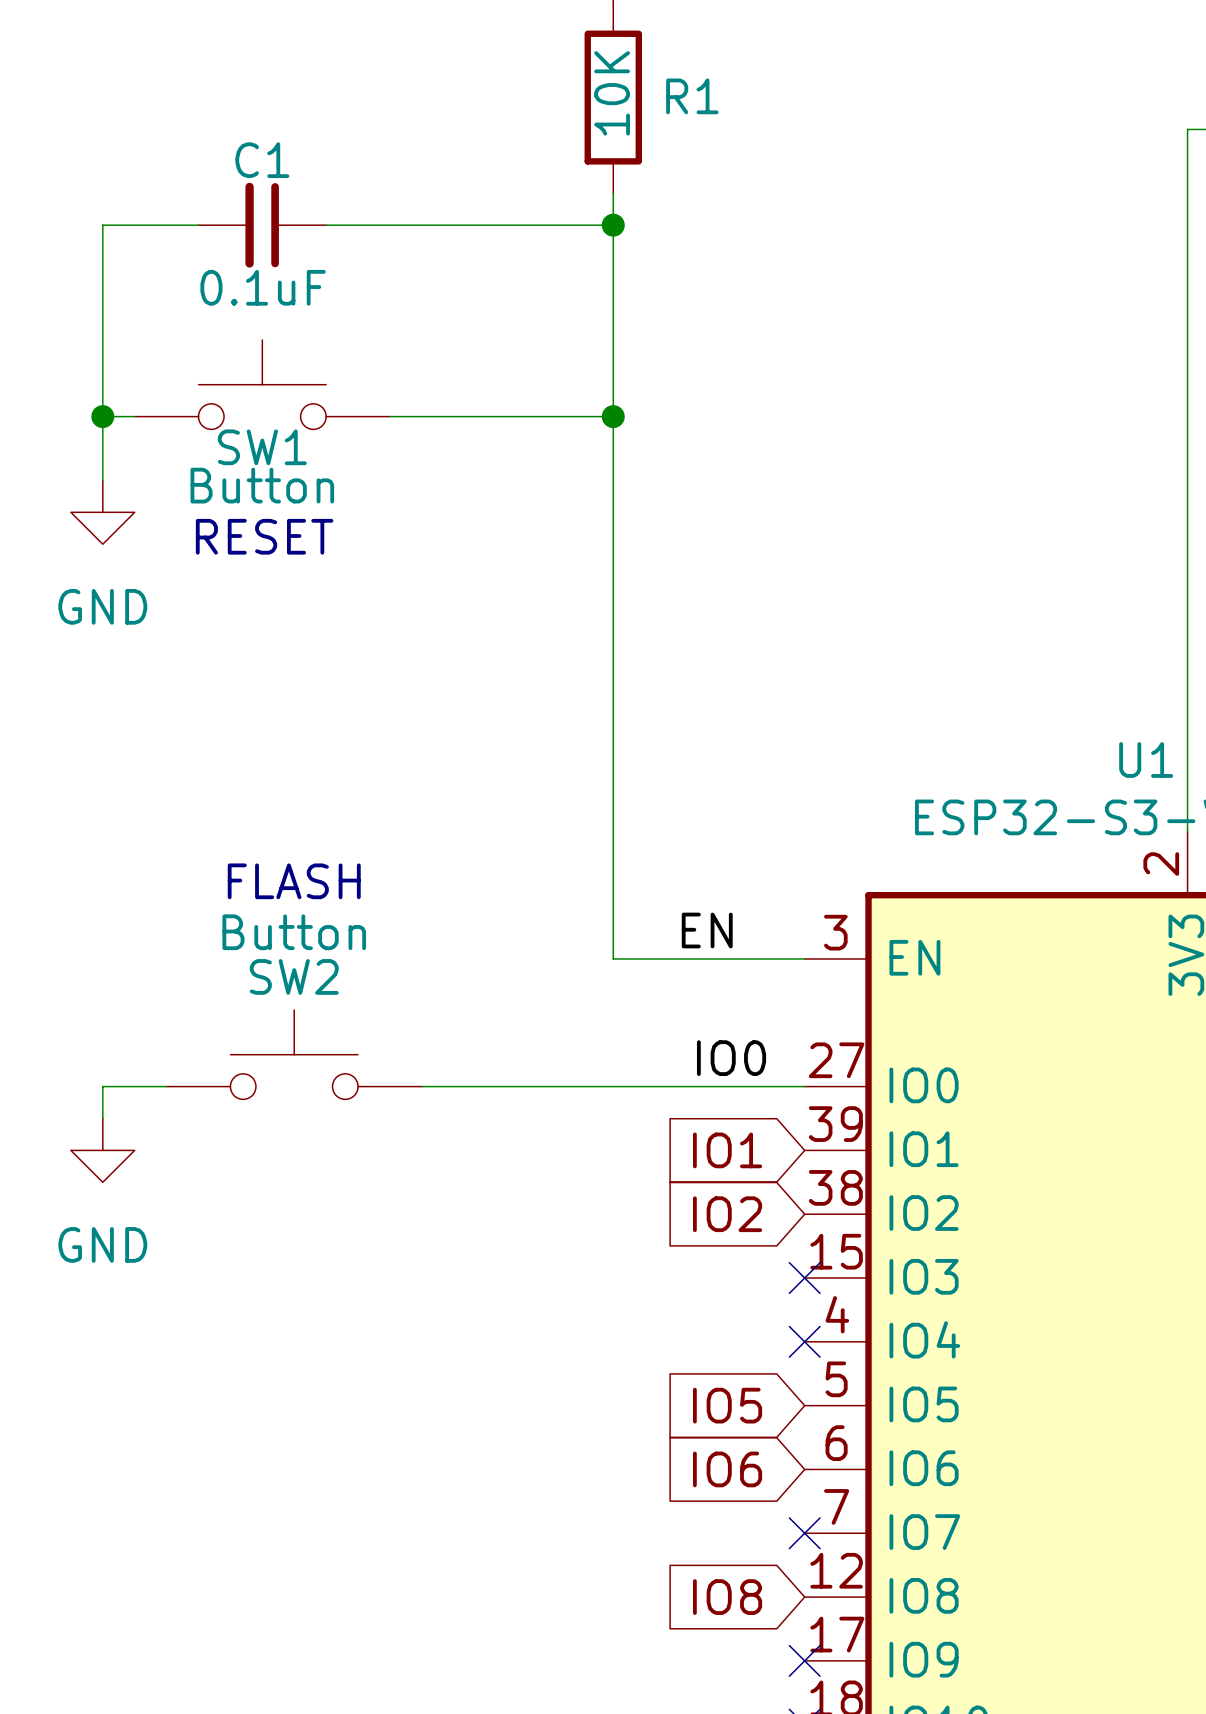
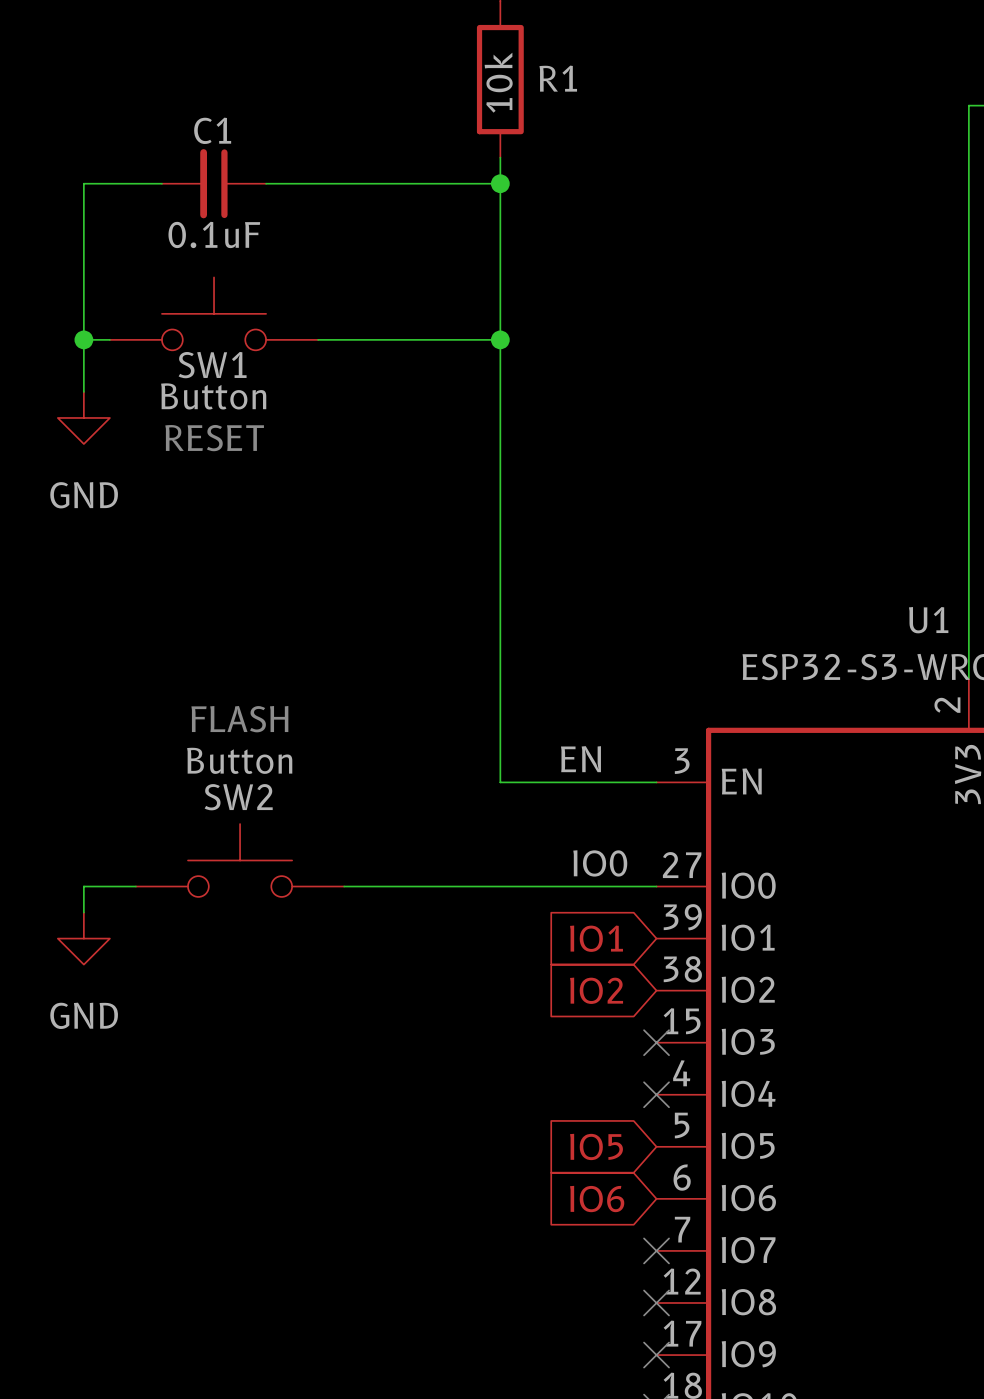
R1 value: 10K (612, 93) -> 10k (498, 82)
global label: IO8 (727, 1597) -> none
no-connect mark: none -> (656, 1302)

